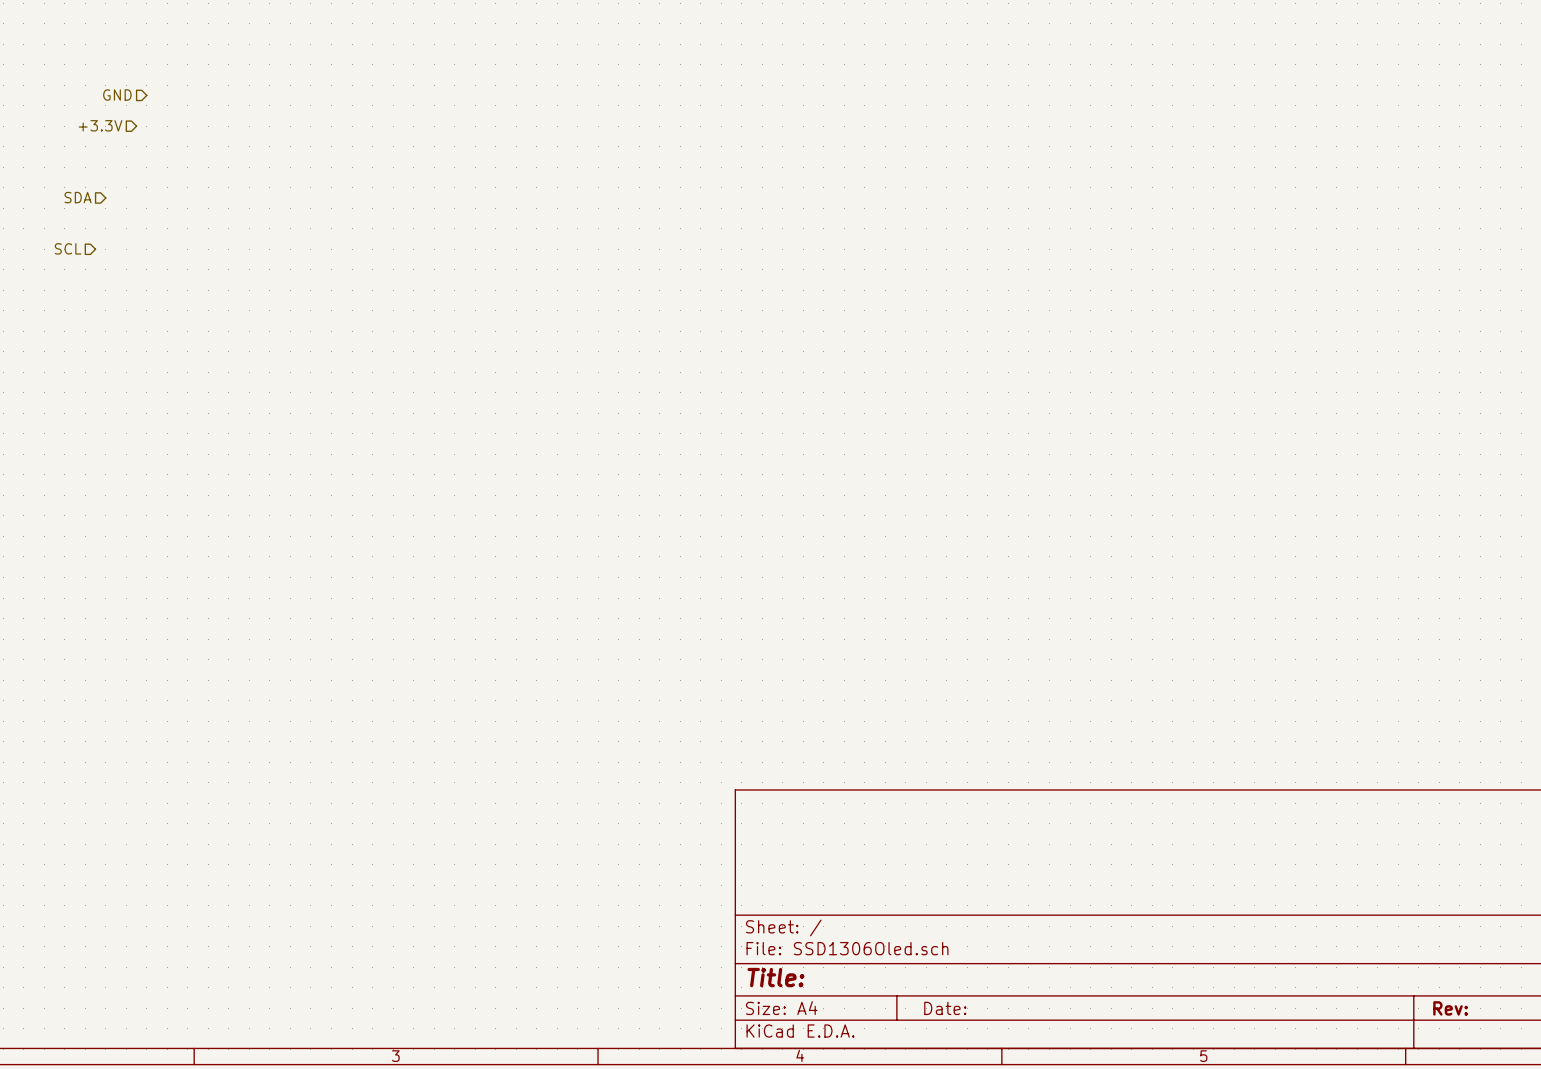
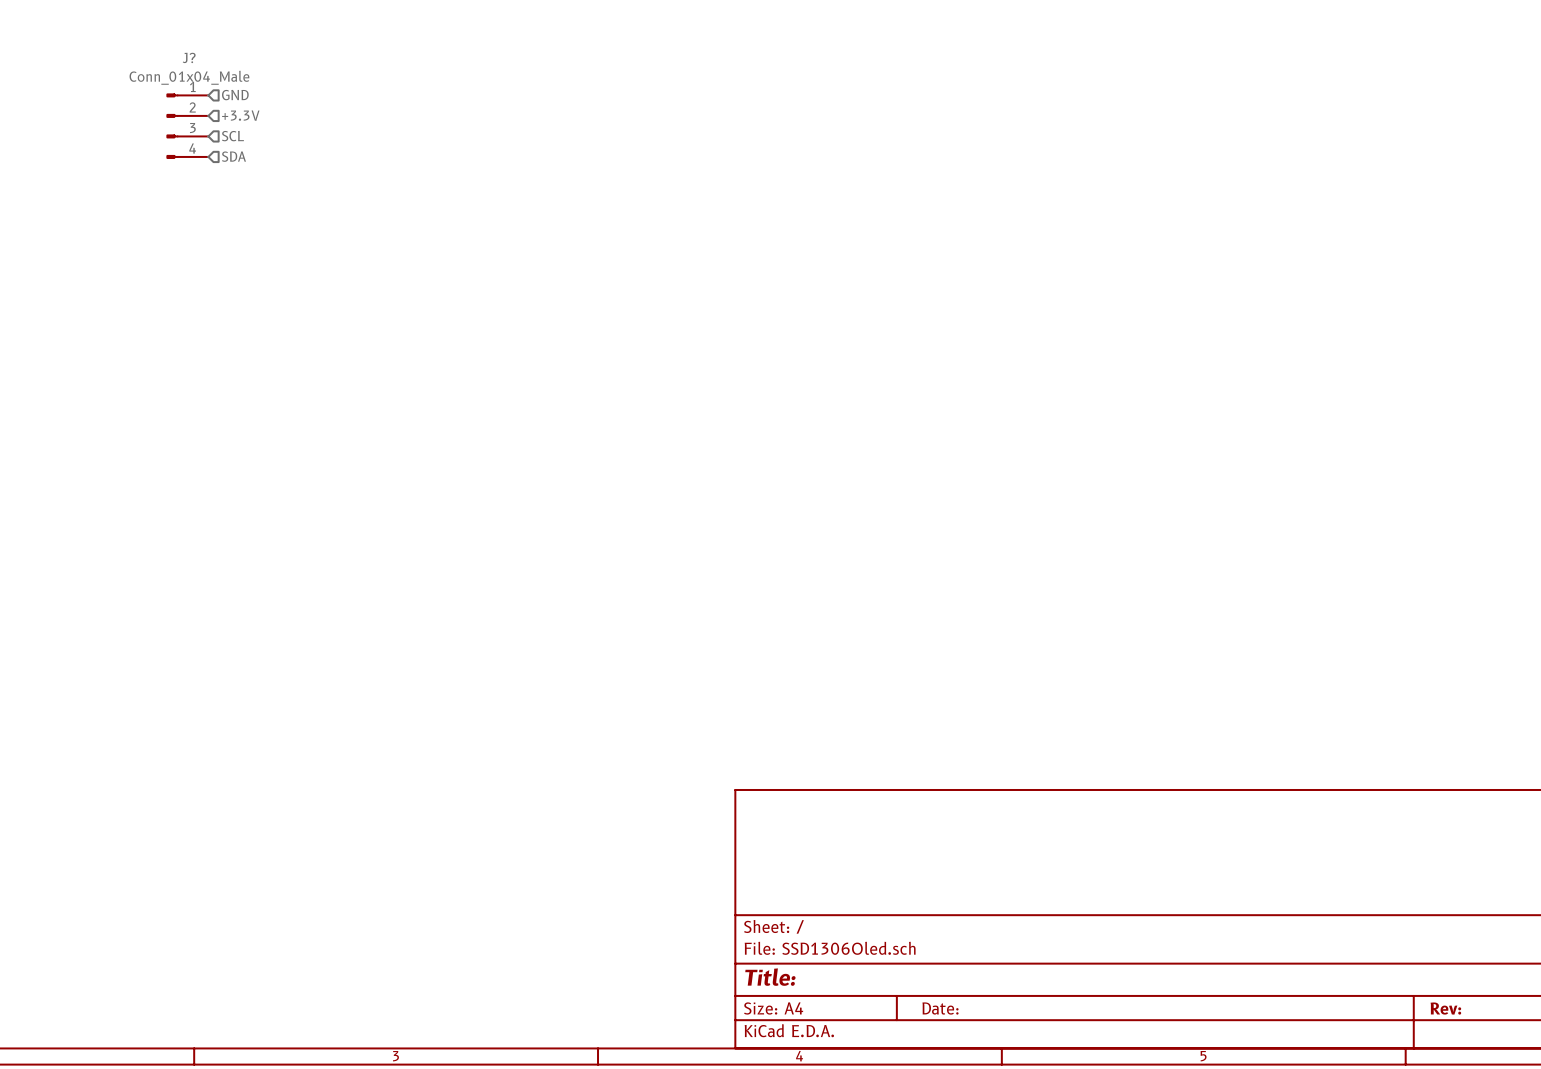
hierarchical label rotation: 0° (117, 95) -> 180° (235, 95)
hierarchical label position: GND (117, 95) -> GND (235, 95)
hierarchical label rotation: 0° (100, 125) -> 180° (240, 115)
hierarchical label position: +3.3V (100, 125) -> +3.3V (240, 115)
J?: none -> Conn_01x04_Male (187, 126)
hierarchical label rotation: 0° (78, 197) -> 180° (233, 156)
hierarchical label position: SDA (78, 197) -> SDA (233, 156)
hierarchical label rotation: 0° (68, 248) -> 180° (232, 136)
hierarchical label position: SCL (68, 248) -> SCL (232, 136)

